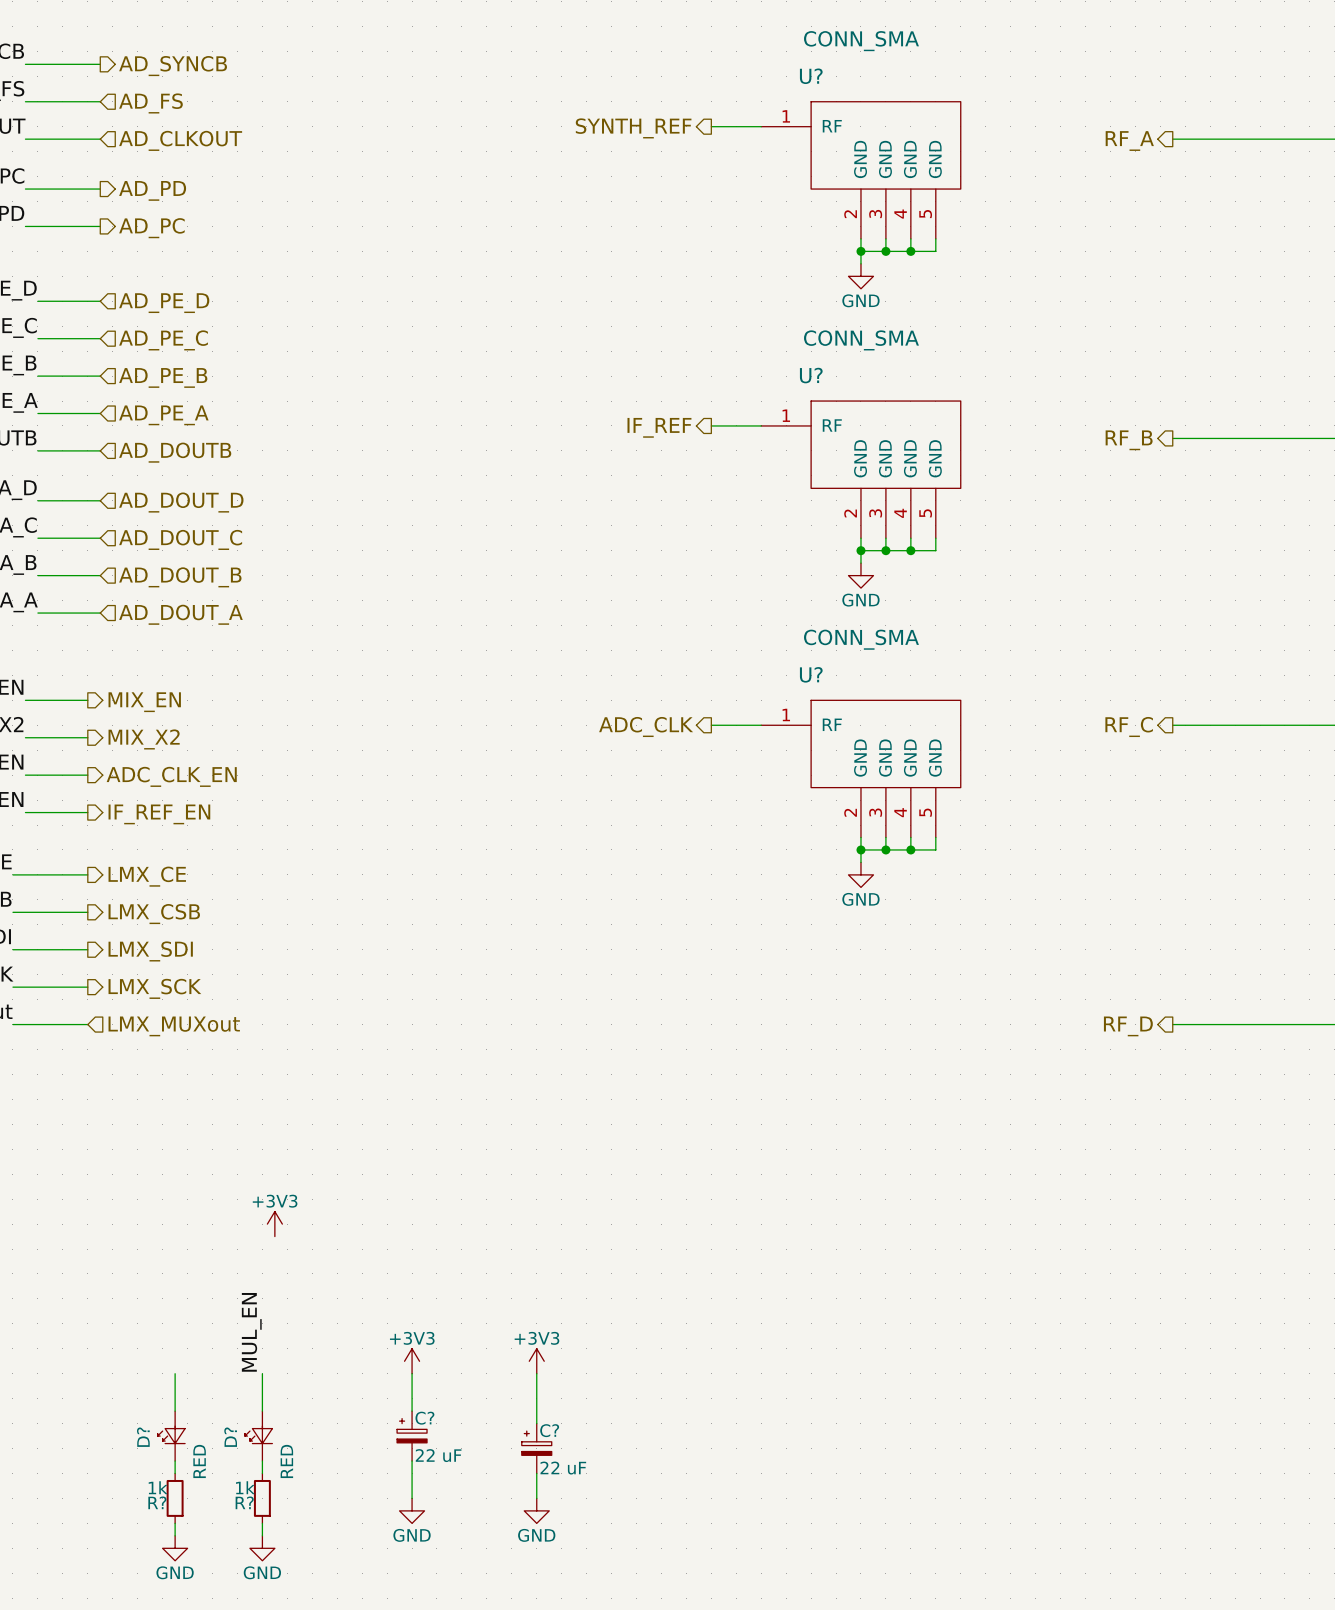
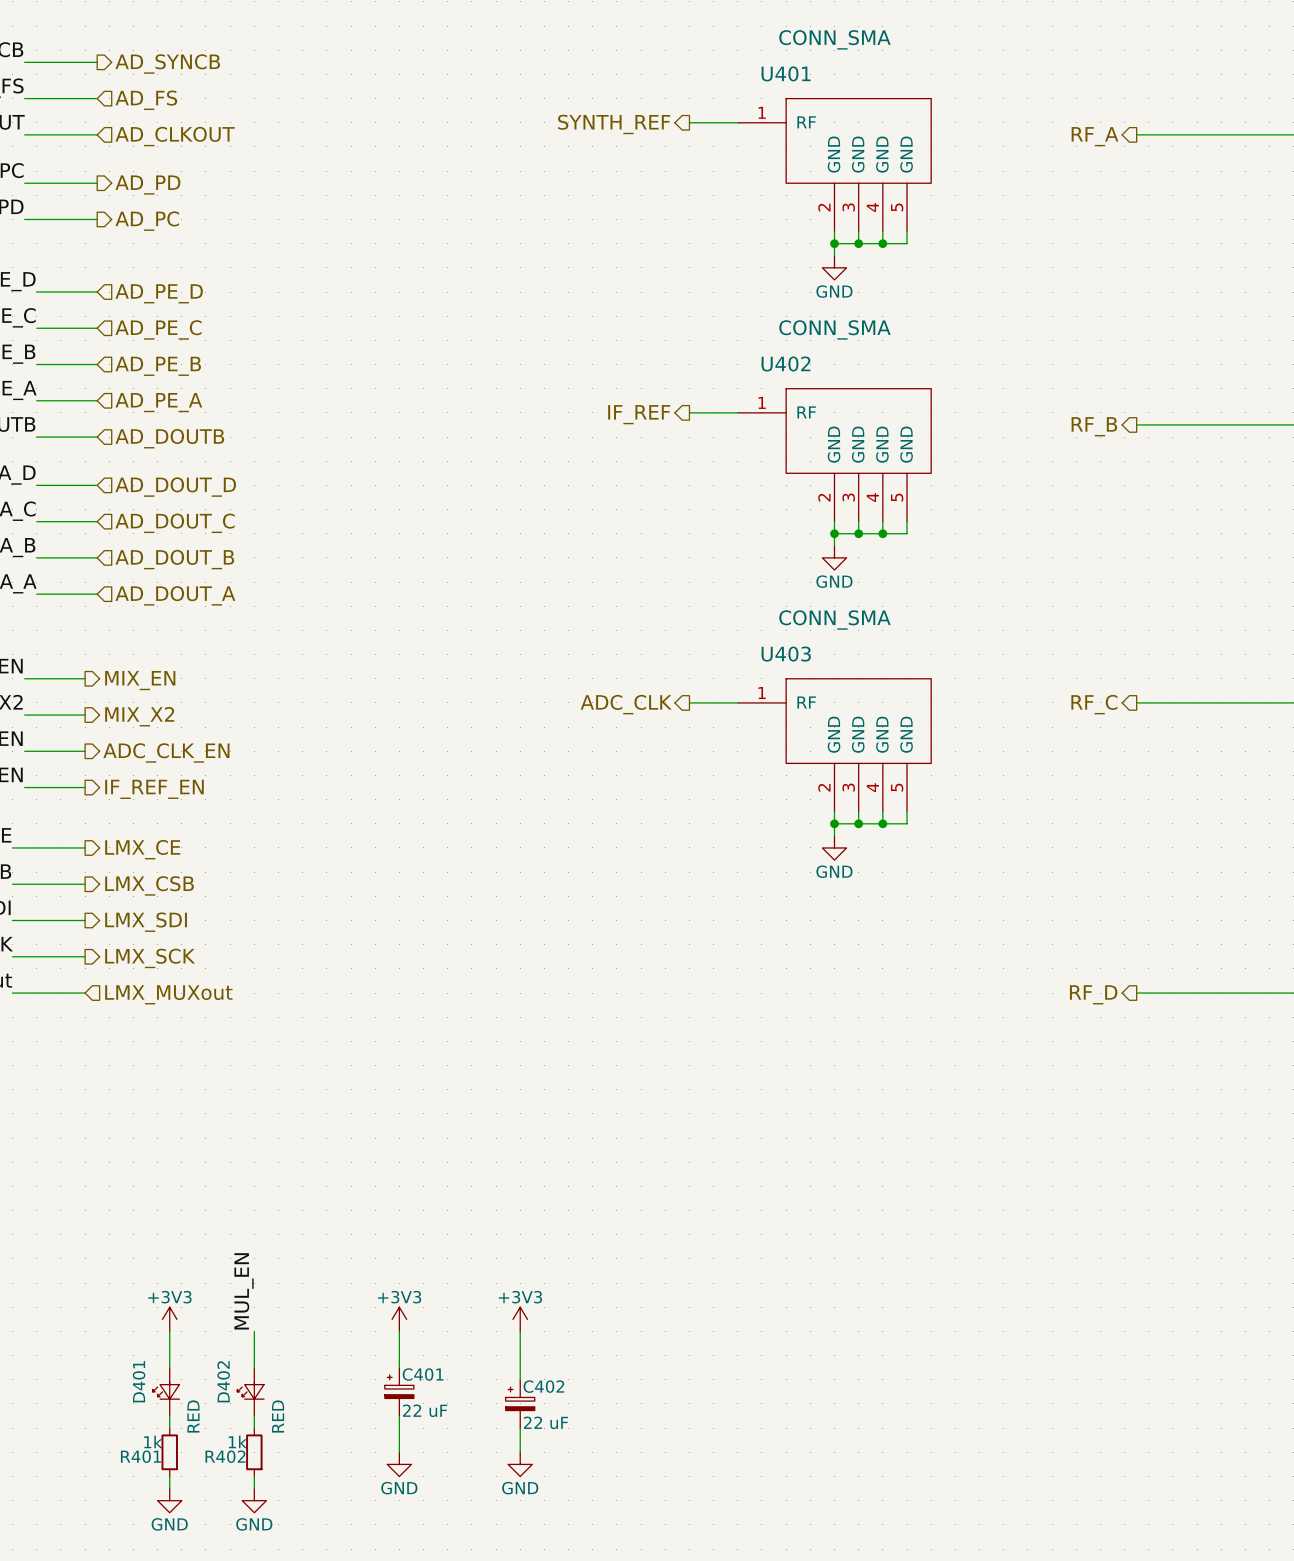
U? name: U? (811, 76) -> U401 (786, 73)
U? name: U? (811, 375) -> U402 (786, 363)
U? name: U? (811, 674) -> U403 (786, 654)
power symbol position: +3V3 (274, 1224) -> +3V3 (169, 1319)
C? name: C? (424, 1418) -> C401 (423, 1374)
C? name: C? (549, 1430) -> C402 (543, 1386)
D? name: D? (143, 1437) -> D401 (139, 1381)
D? name: D? (230, 1437) -> D402 (223, 1381)
R? name: R? (157, 1502) -> R401 (140, 1456)
R? name: R? (244, 1502) -> R402 (225, 1456)

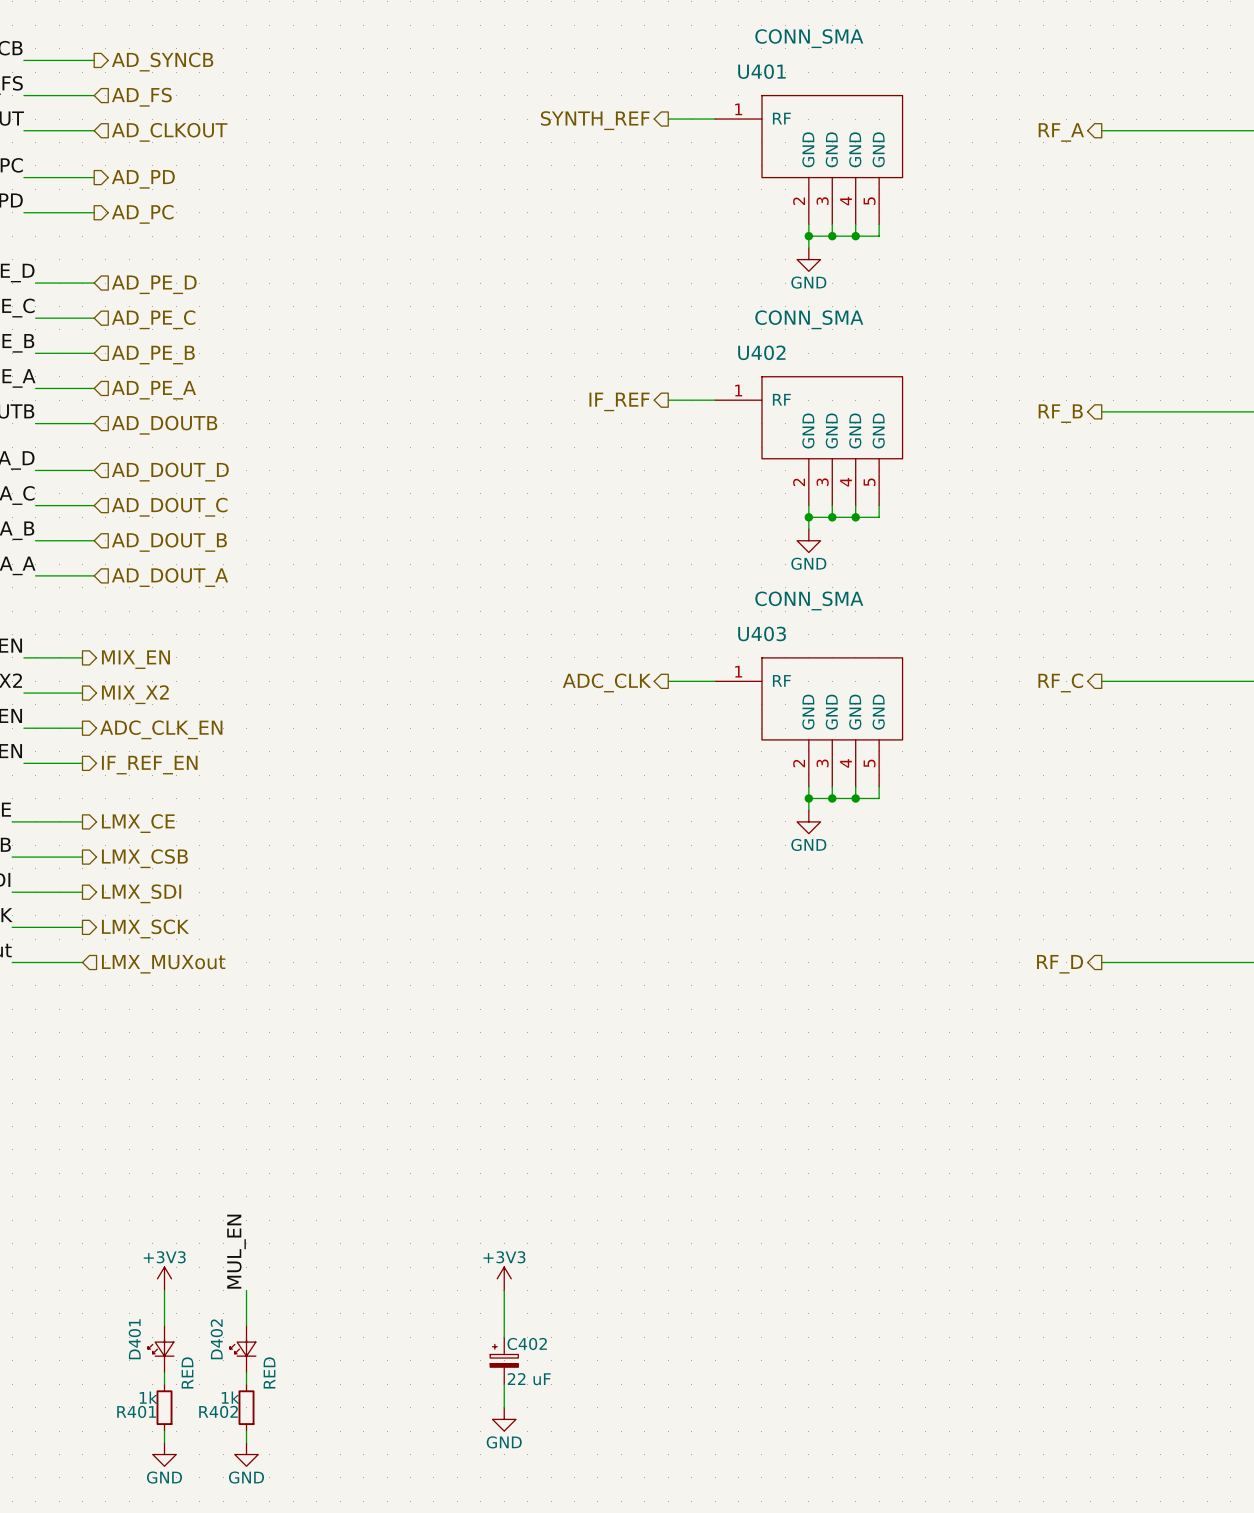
power symbol: +3V3 (399, 1319) -> none
wire: (399, 1331) (399, 1367) -> none
C401: 22 uF (399, 1391) -> none
wire: (399, 1416) (399, 1452) -> none
power symbol: GND (399, 1464) -> none

